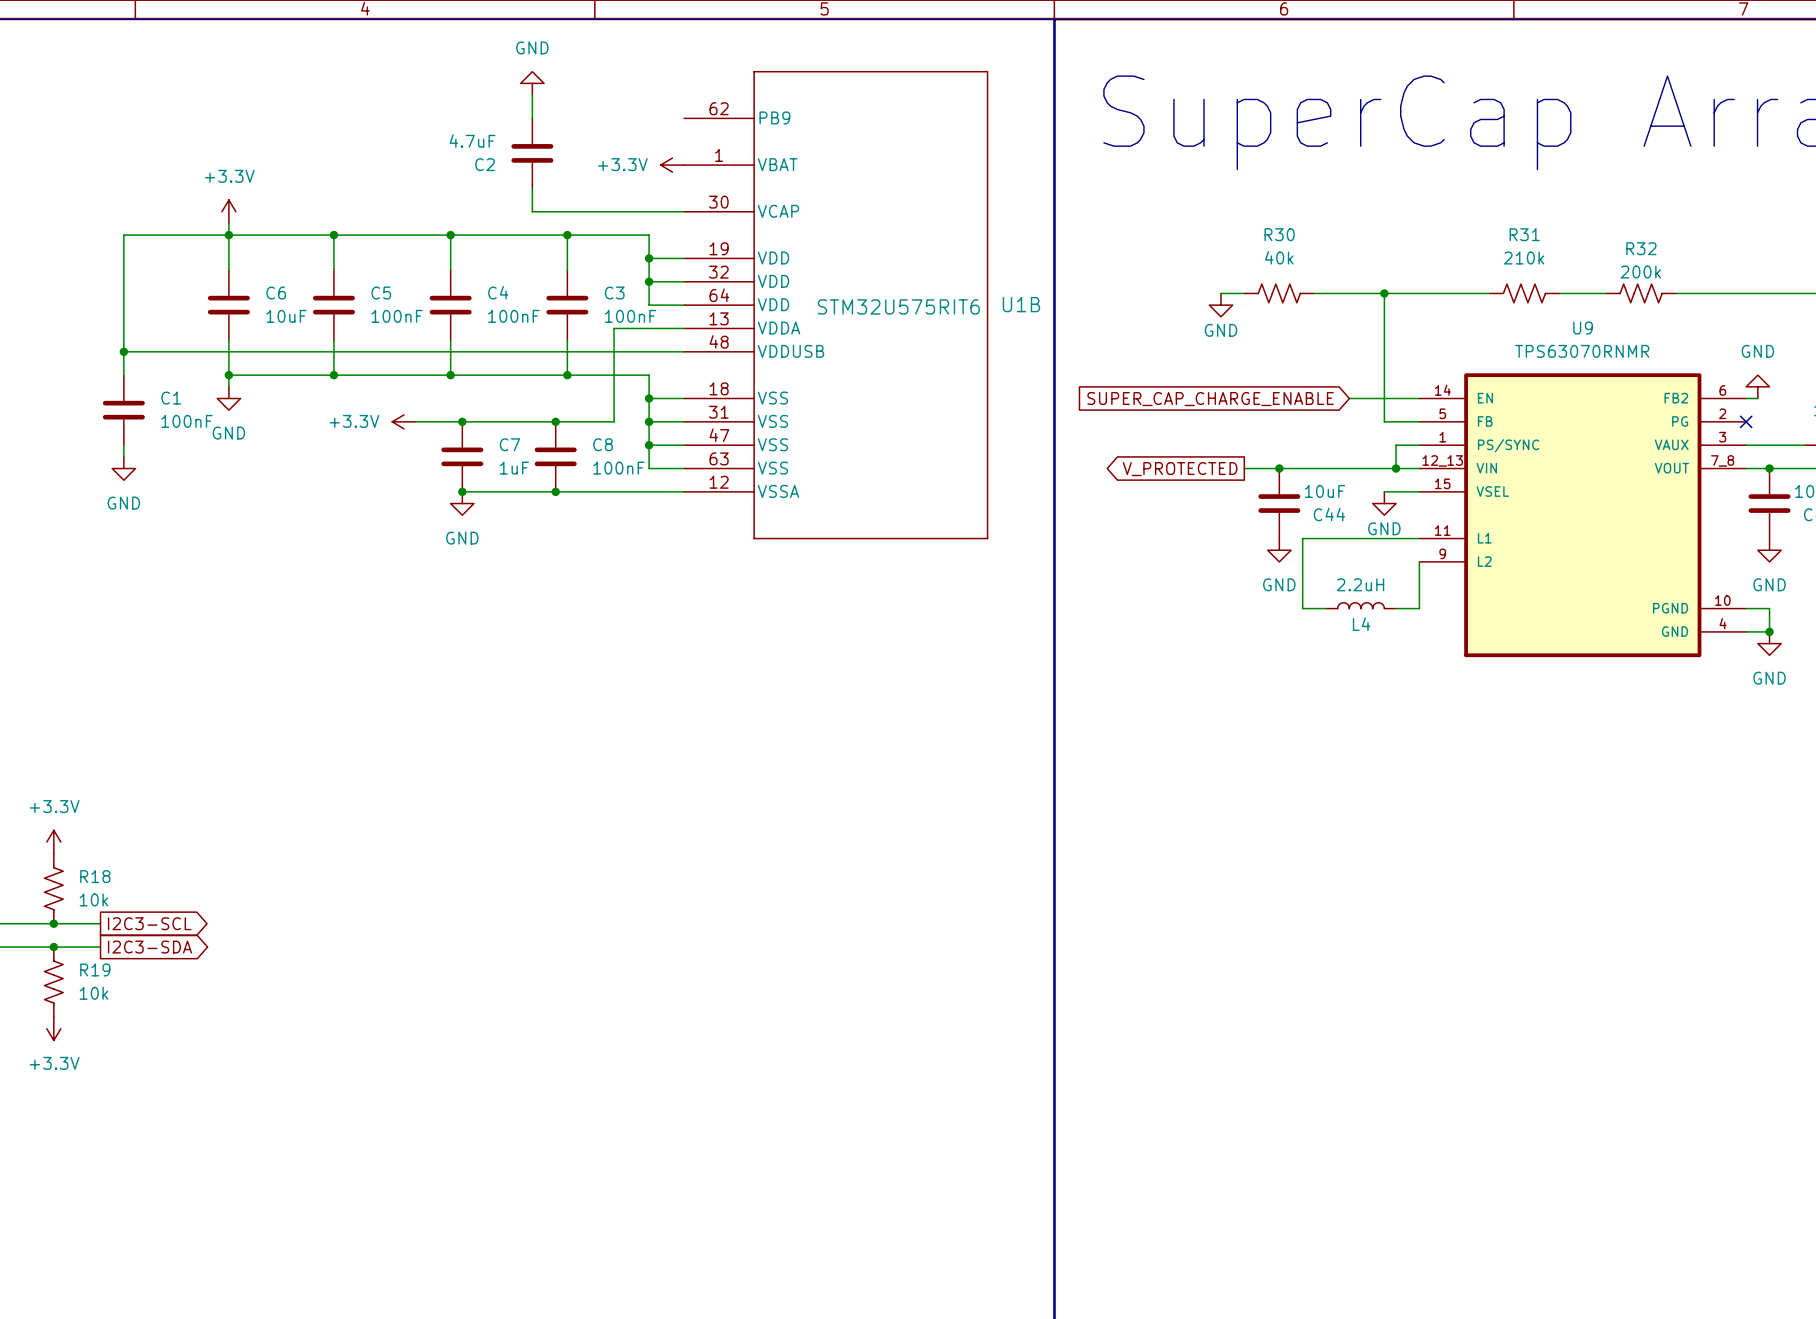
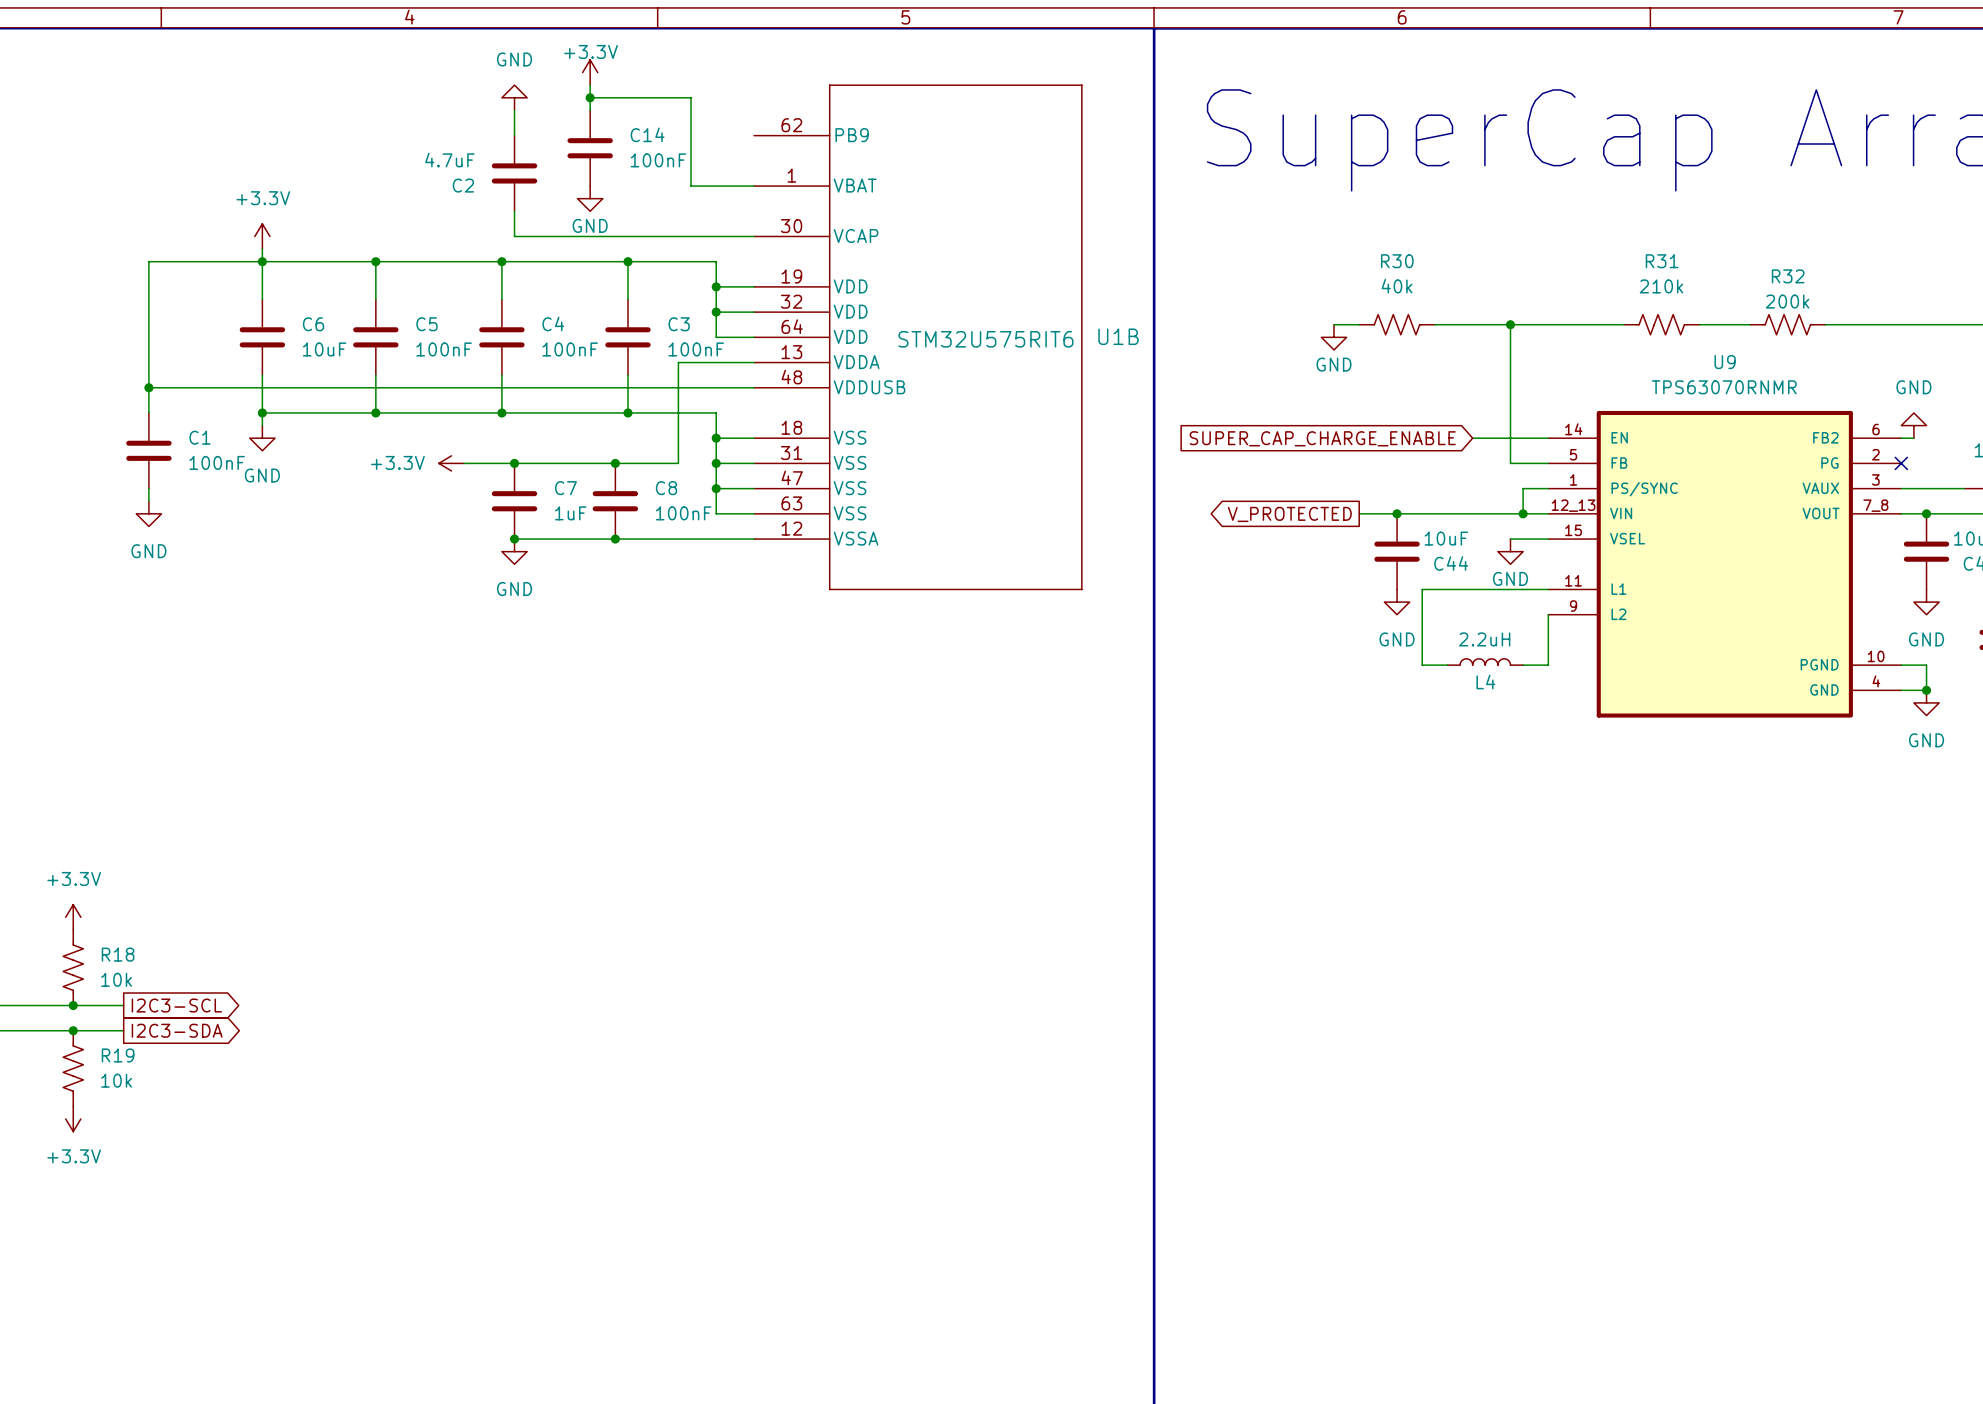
power symbol: none -> GND (514, 97)
wire: none -> (590, 97) (691, 97) (691, 186) (754, 186)
power symbol: GND (532, 83) -> none
junction: none -> (590, 97)
wire: none -> (514, 110) (514, 135)
C14: none -> 100nF (590, 148)
C2 position: (532, 153) -> (514, 173)
power symbol text position: +3.3V (622, 164) -> +3.3V (591, 51)
power symbol rotation: 0° (672, 165) -> 90° clockwise (590, 72)
power symbol position: +3.3V (672, 165) -> +3.3V (590, 72)
power symbol: none -> GND (590, 198)
wire: (532, 188) (532, 211) -> (514, 211) (514, 236) (590, 236)

